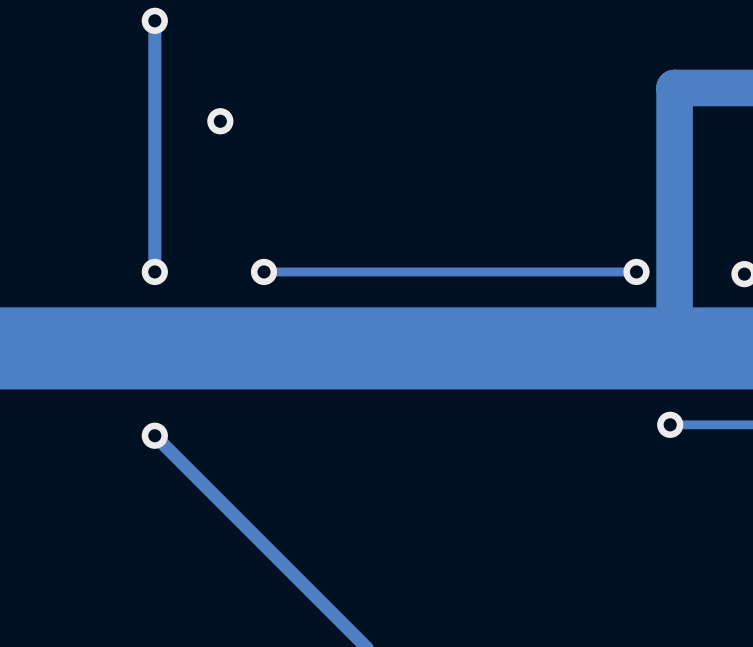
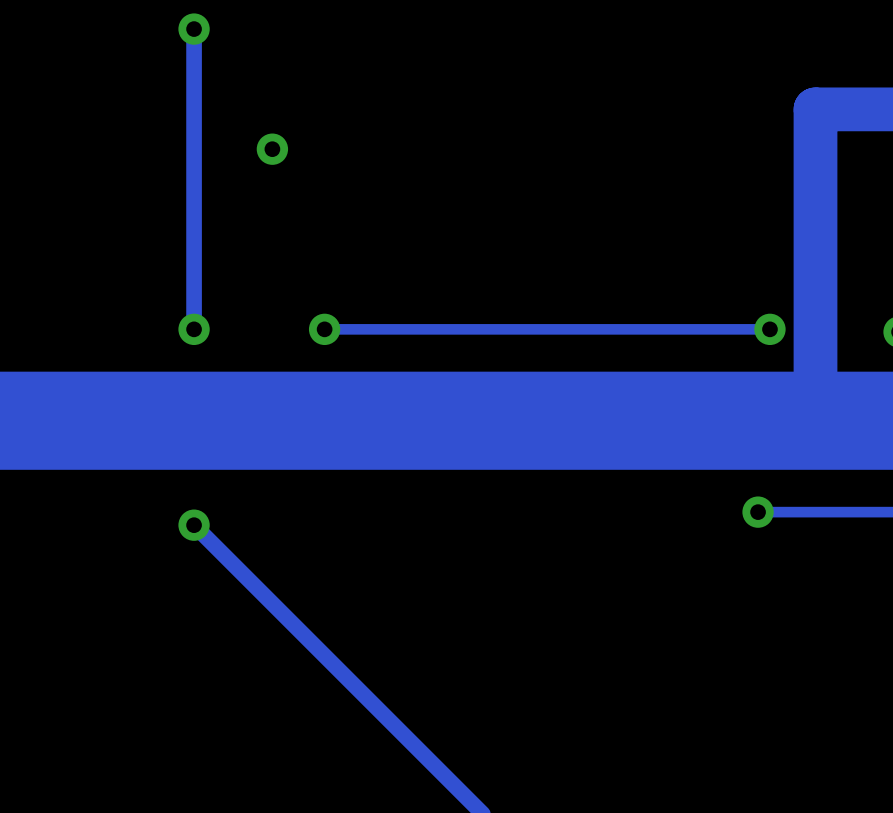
track: none -> (810, 512) (758, 512)
via position: (670, 424) -> (758, 512)

